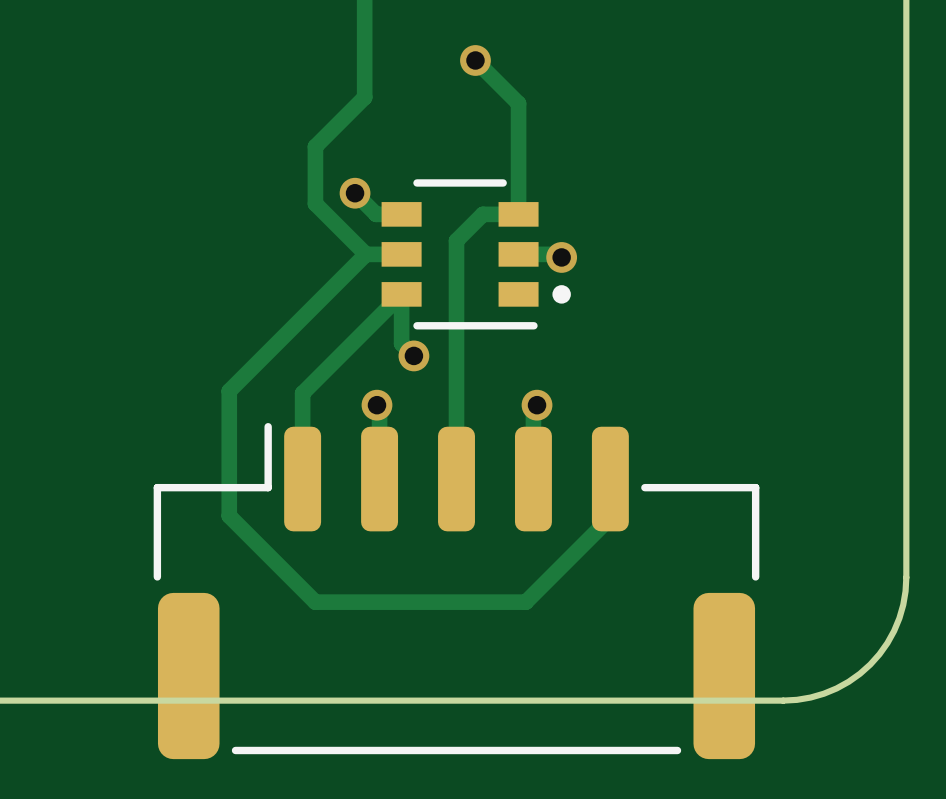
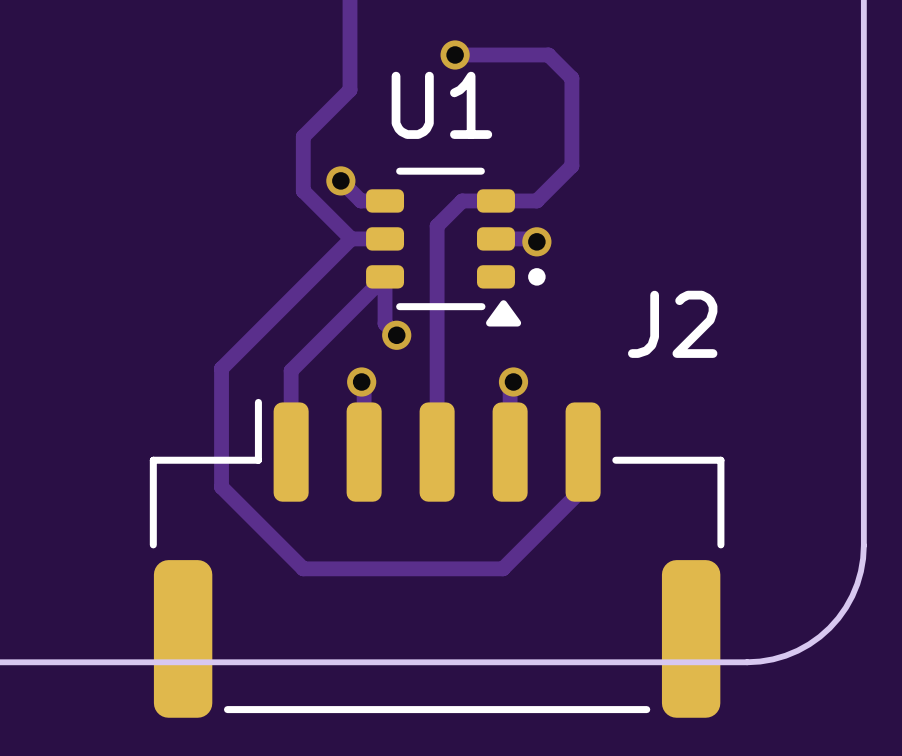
track: (475, 60) (518, 103) (518, 214) -> (455, 54) (548, 54) (571, 78) (571, 165) (536, 200) (495, 200)
part: (460, 254) -> none
U1: none -> (443, 247)
J2 name: none -> J2 (672, 324)

